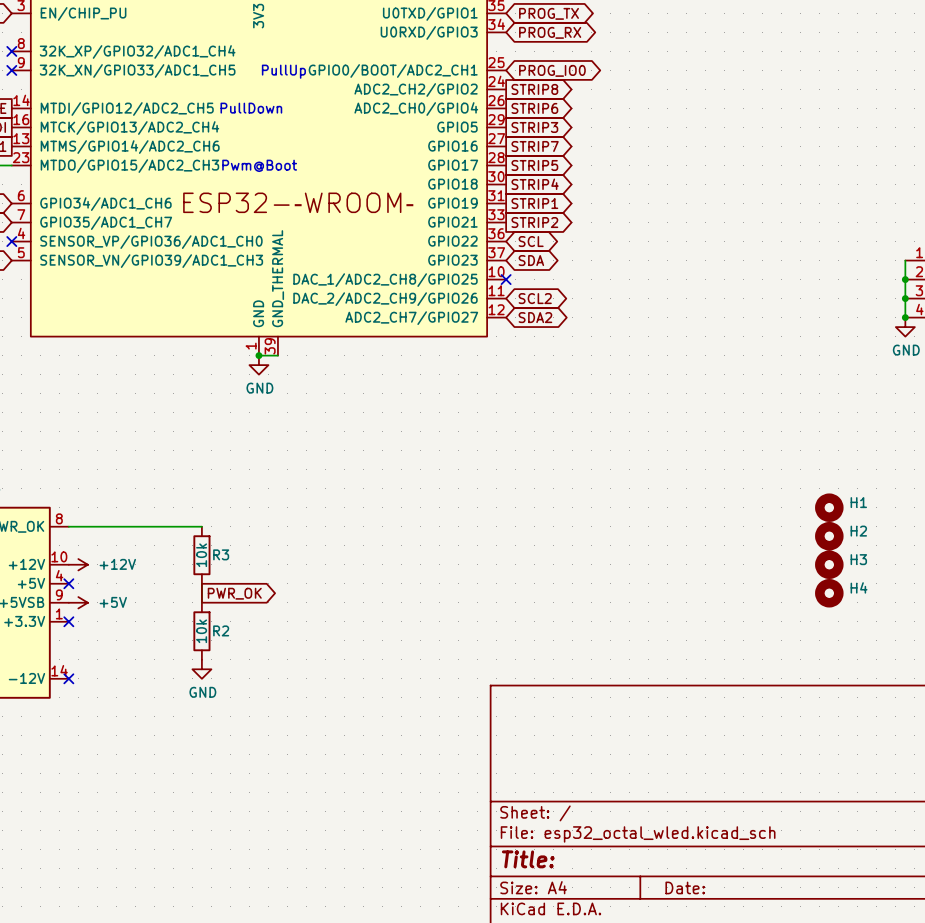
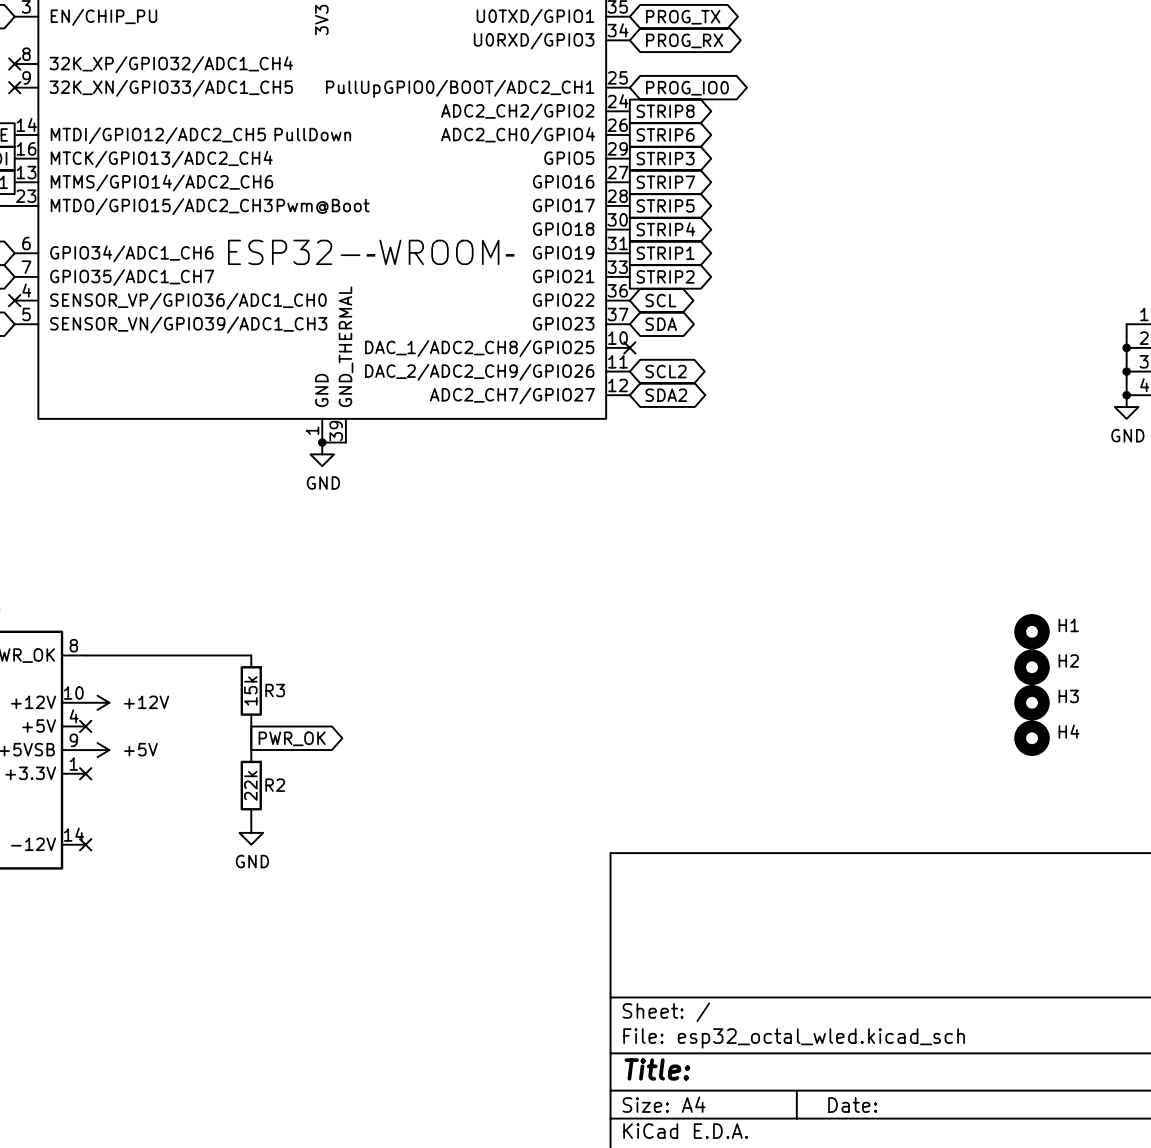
R3 value: 10k (201, 555) -> 15k (250, 690)
R2 value: 10k (201, 631) -> 22k (250, 785)

